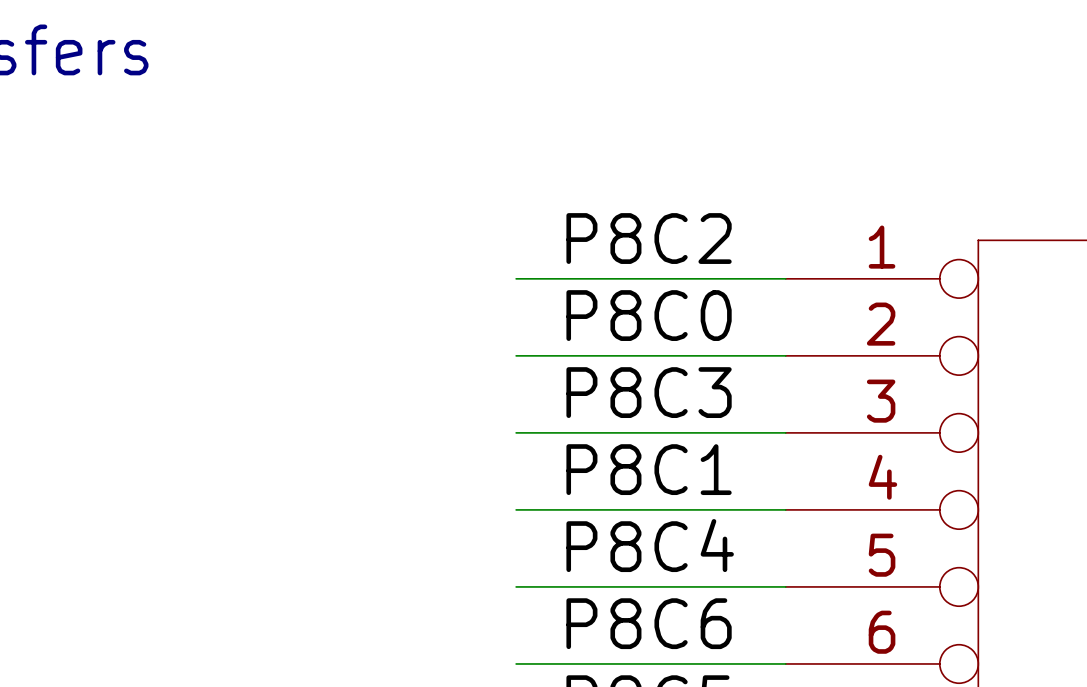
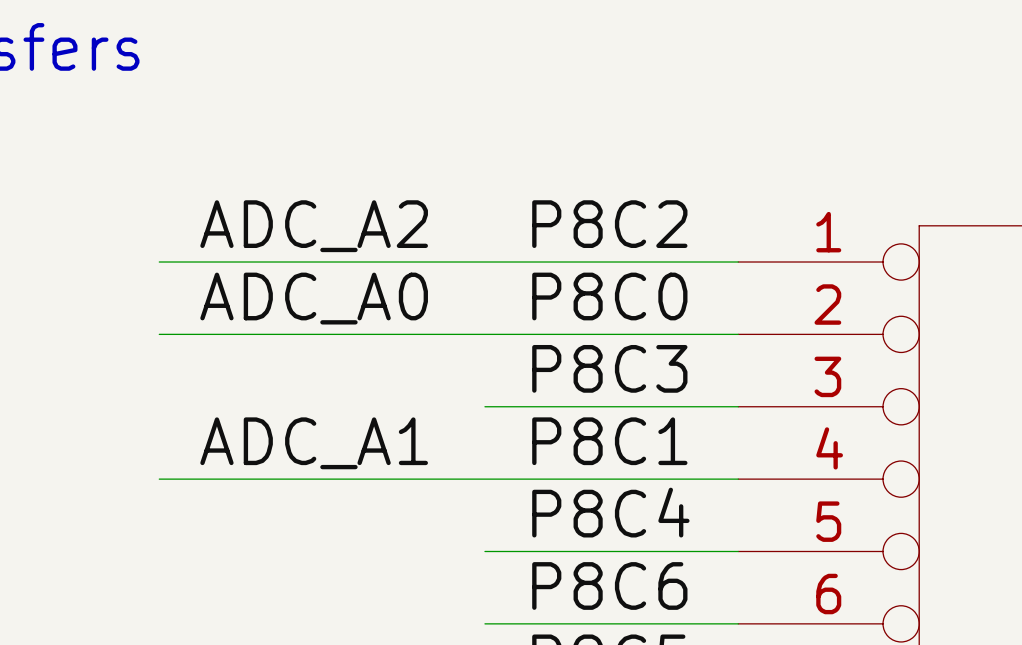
label: none -> ADC_A2 (314, 226)
wire: none -> (159, 262) (484, 262)
label: none -> ADC_A0 (314, 298)
wire: none -> (159, 334) (484, 334)
label: none -> ADC_A1 (314, 443)
wire: none -> (159, 479) (484, 479)

